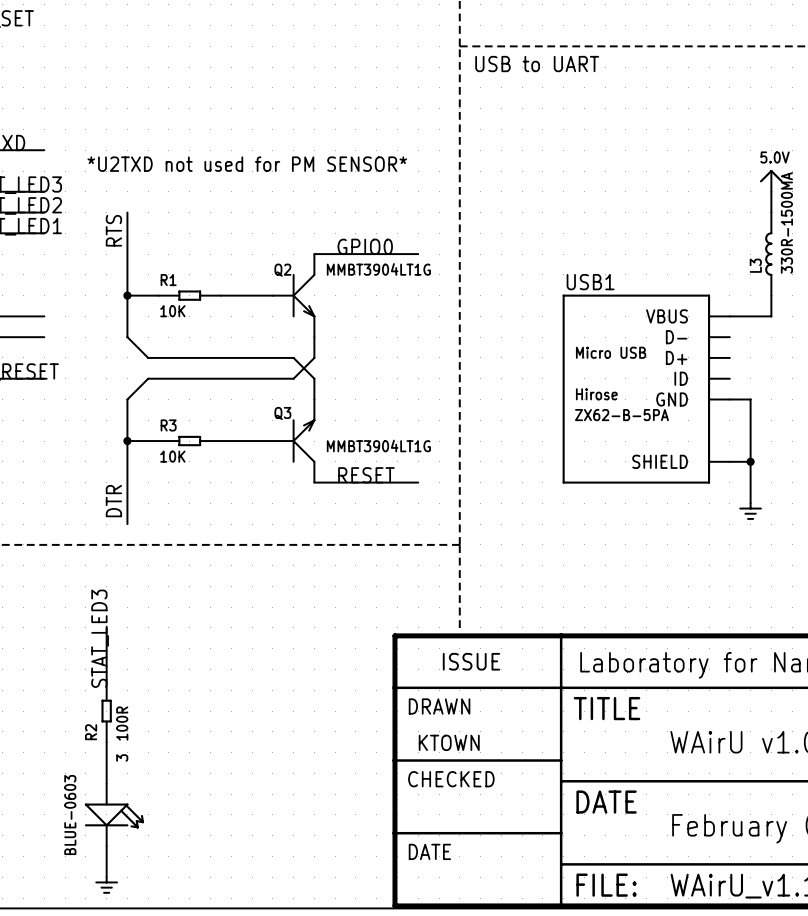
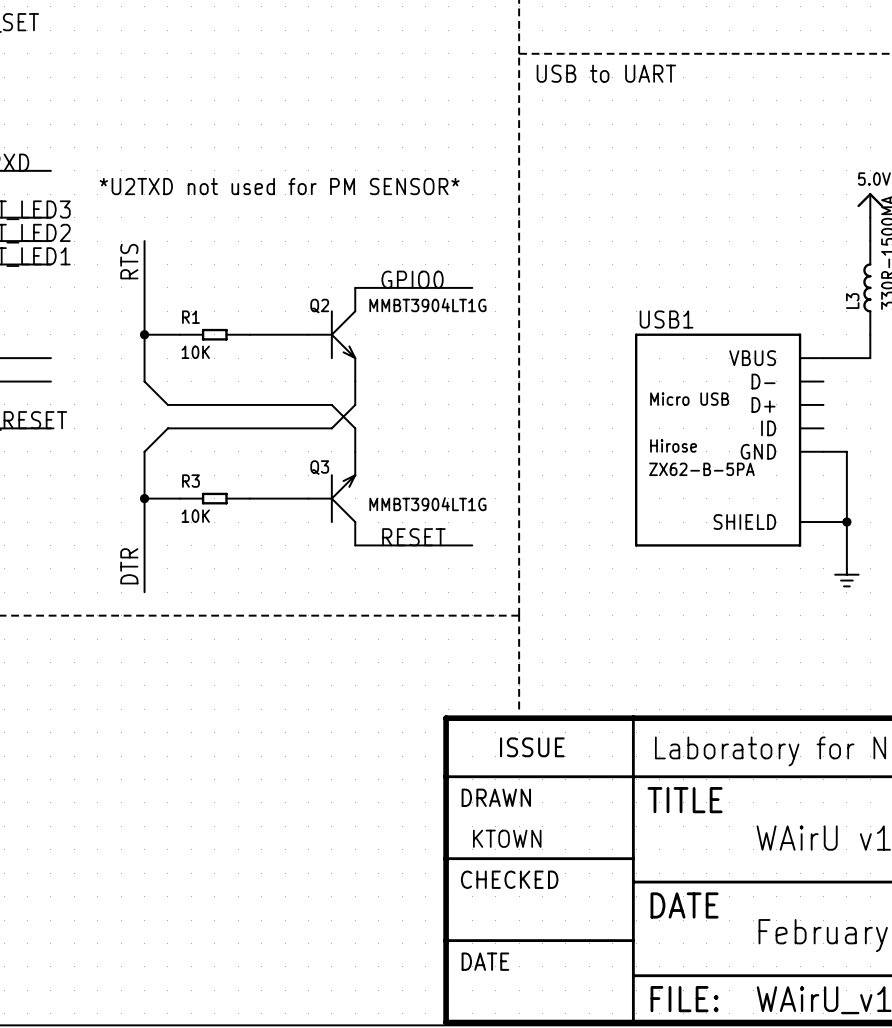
wire: (106, 627) (106, 679) -> none
label: STAT_LED3 (100, 638) -> none
R2: 100R (106, 711) -> none
wire: (106, 742) (106, 783) -> none
3: BLUE-0603 (114, 814) -> none
wire: (106, 846) (106, 877) -> none
power symbol: (106, 885) -> none

